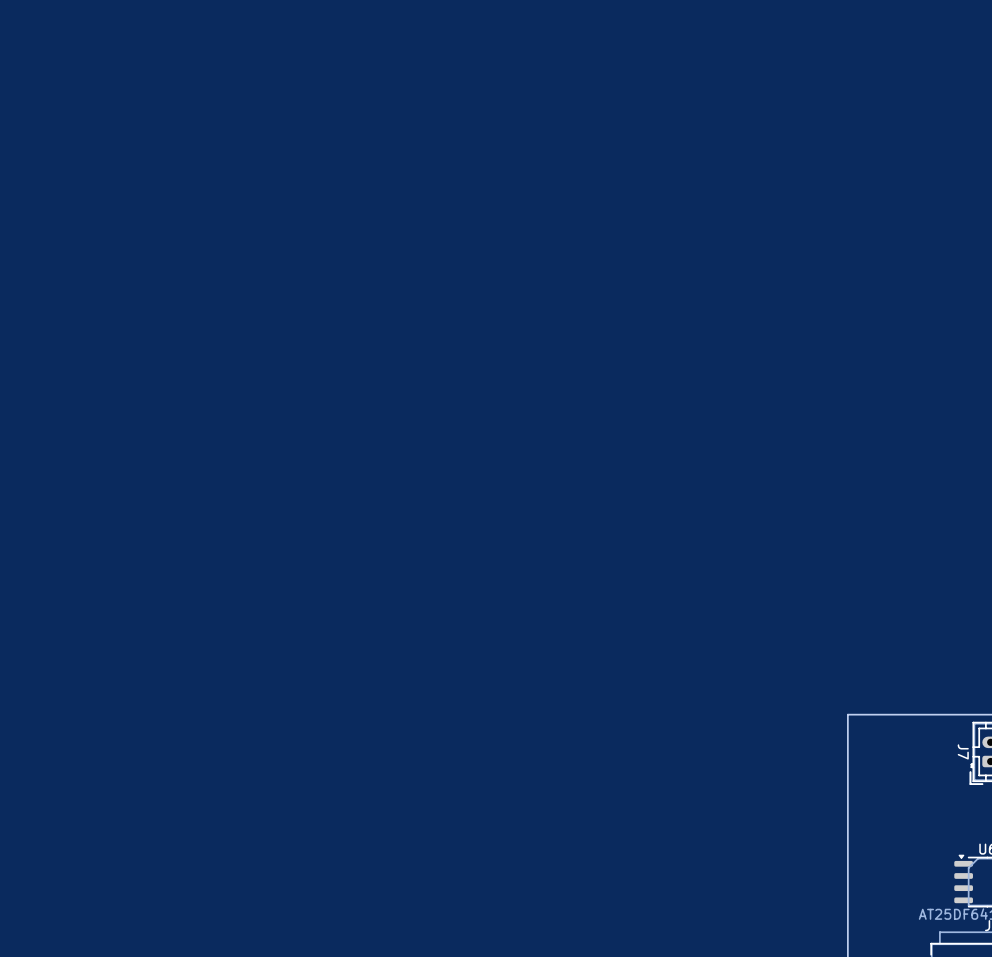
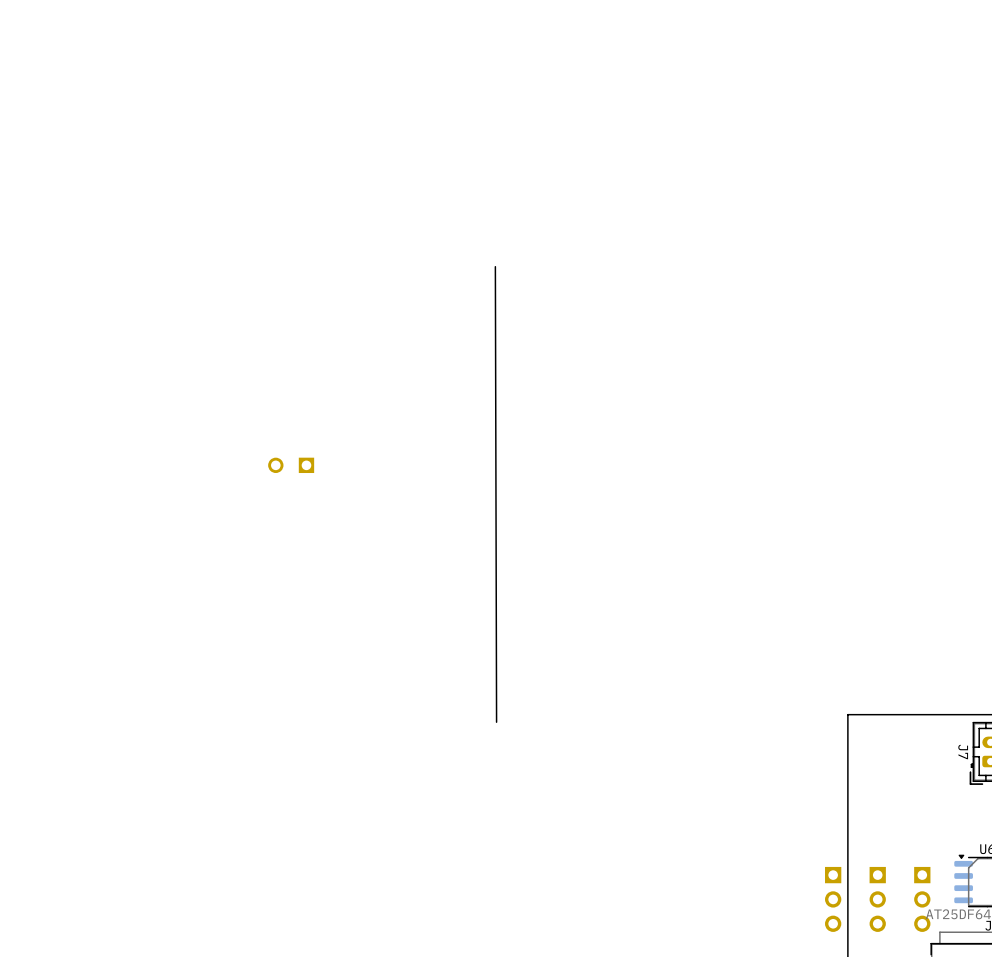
board edge: none -> (495, 266) (496, 722)
part: none -> (291, 465)
part: none -> (833, 899)
part: none -> (877, 899)
part: none -> (922, 899)

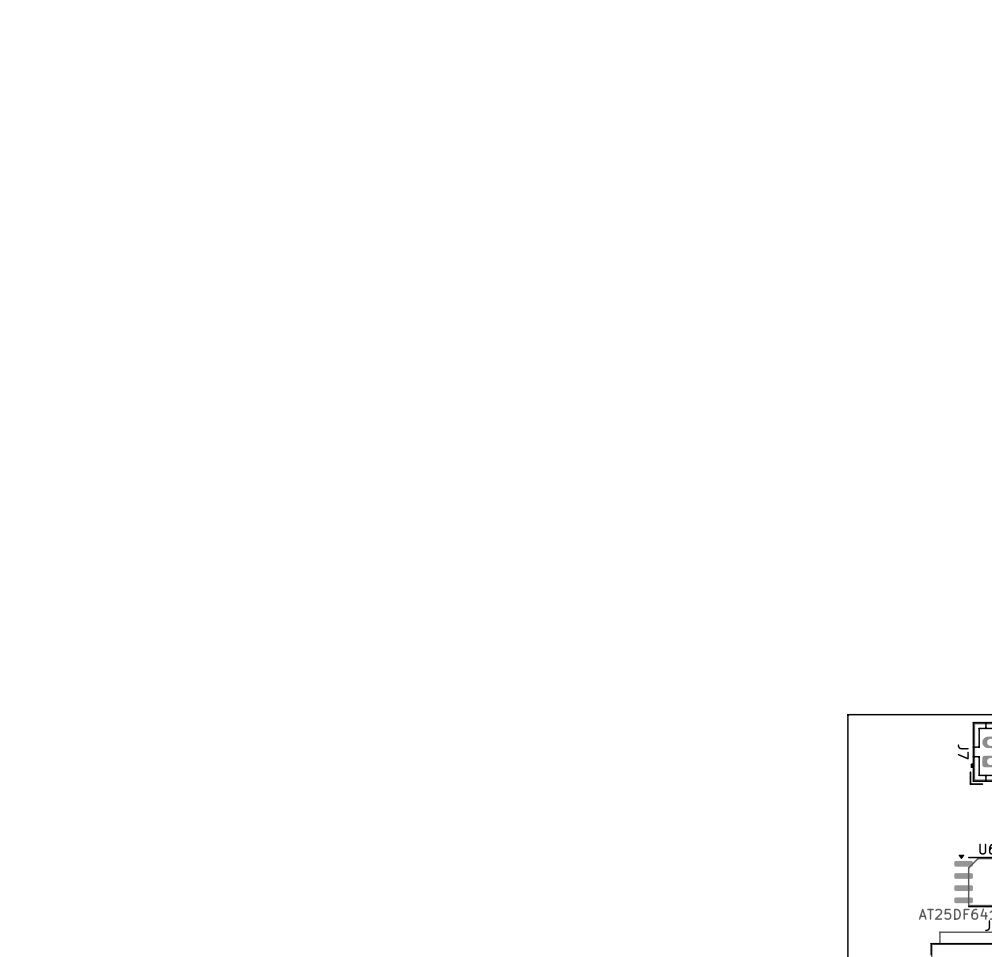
board edge: (495, 266) (496, 722) -> none
part: (291, 465) -> none
part: (833, 899) -> none
part: (877, 899) -> none
part: (922, 899) -> none

